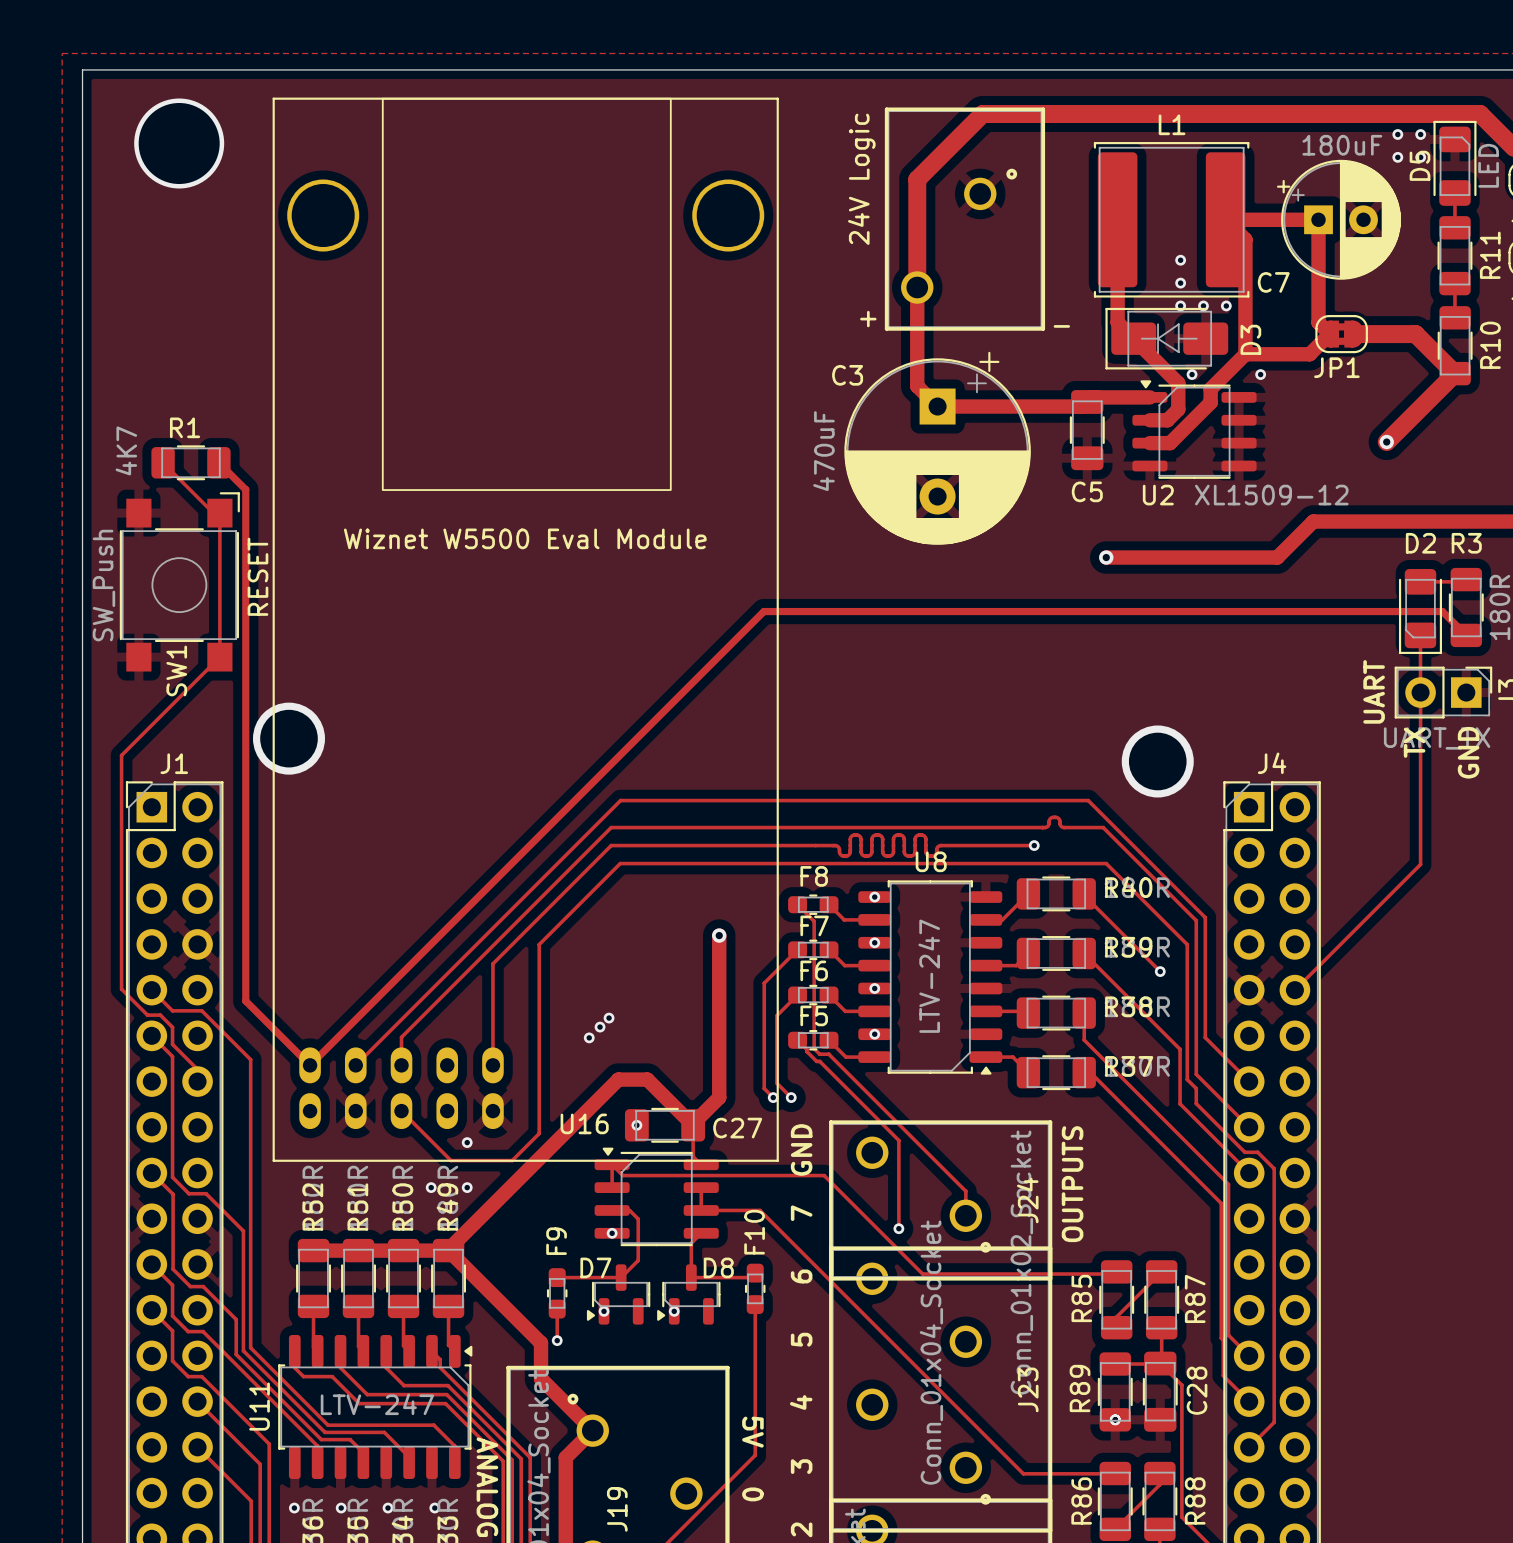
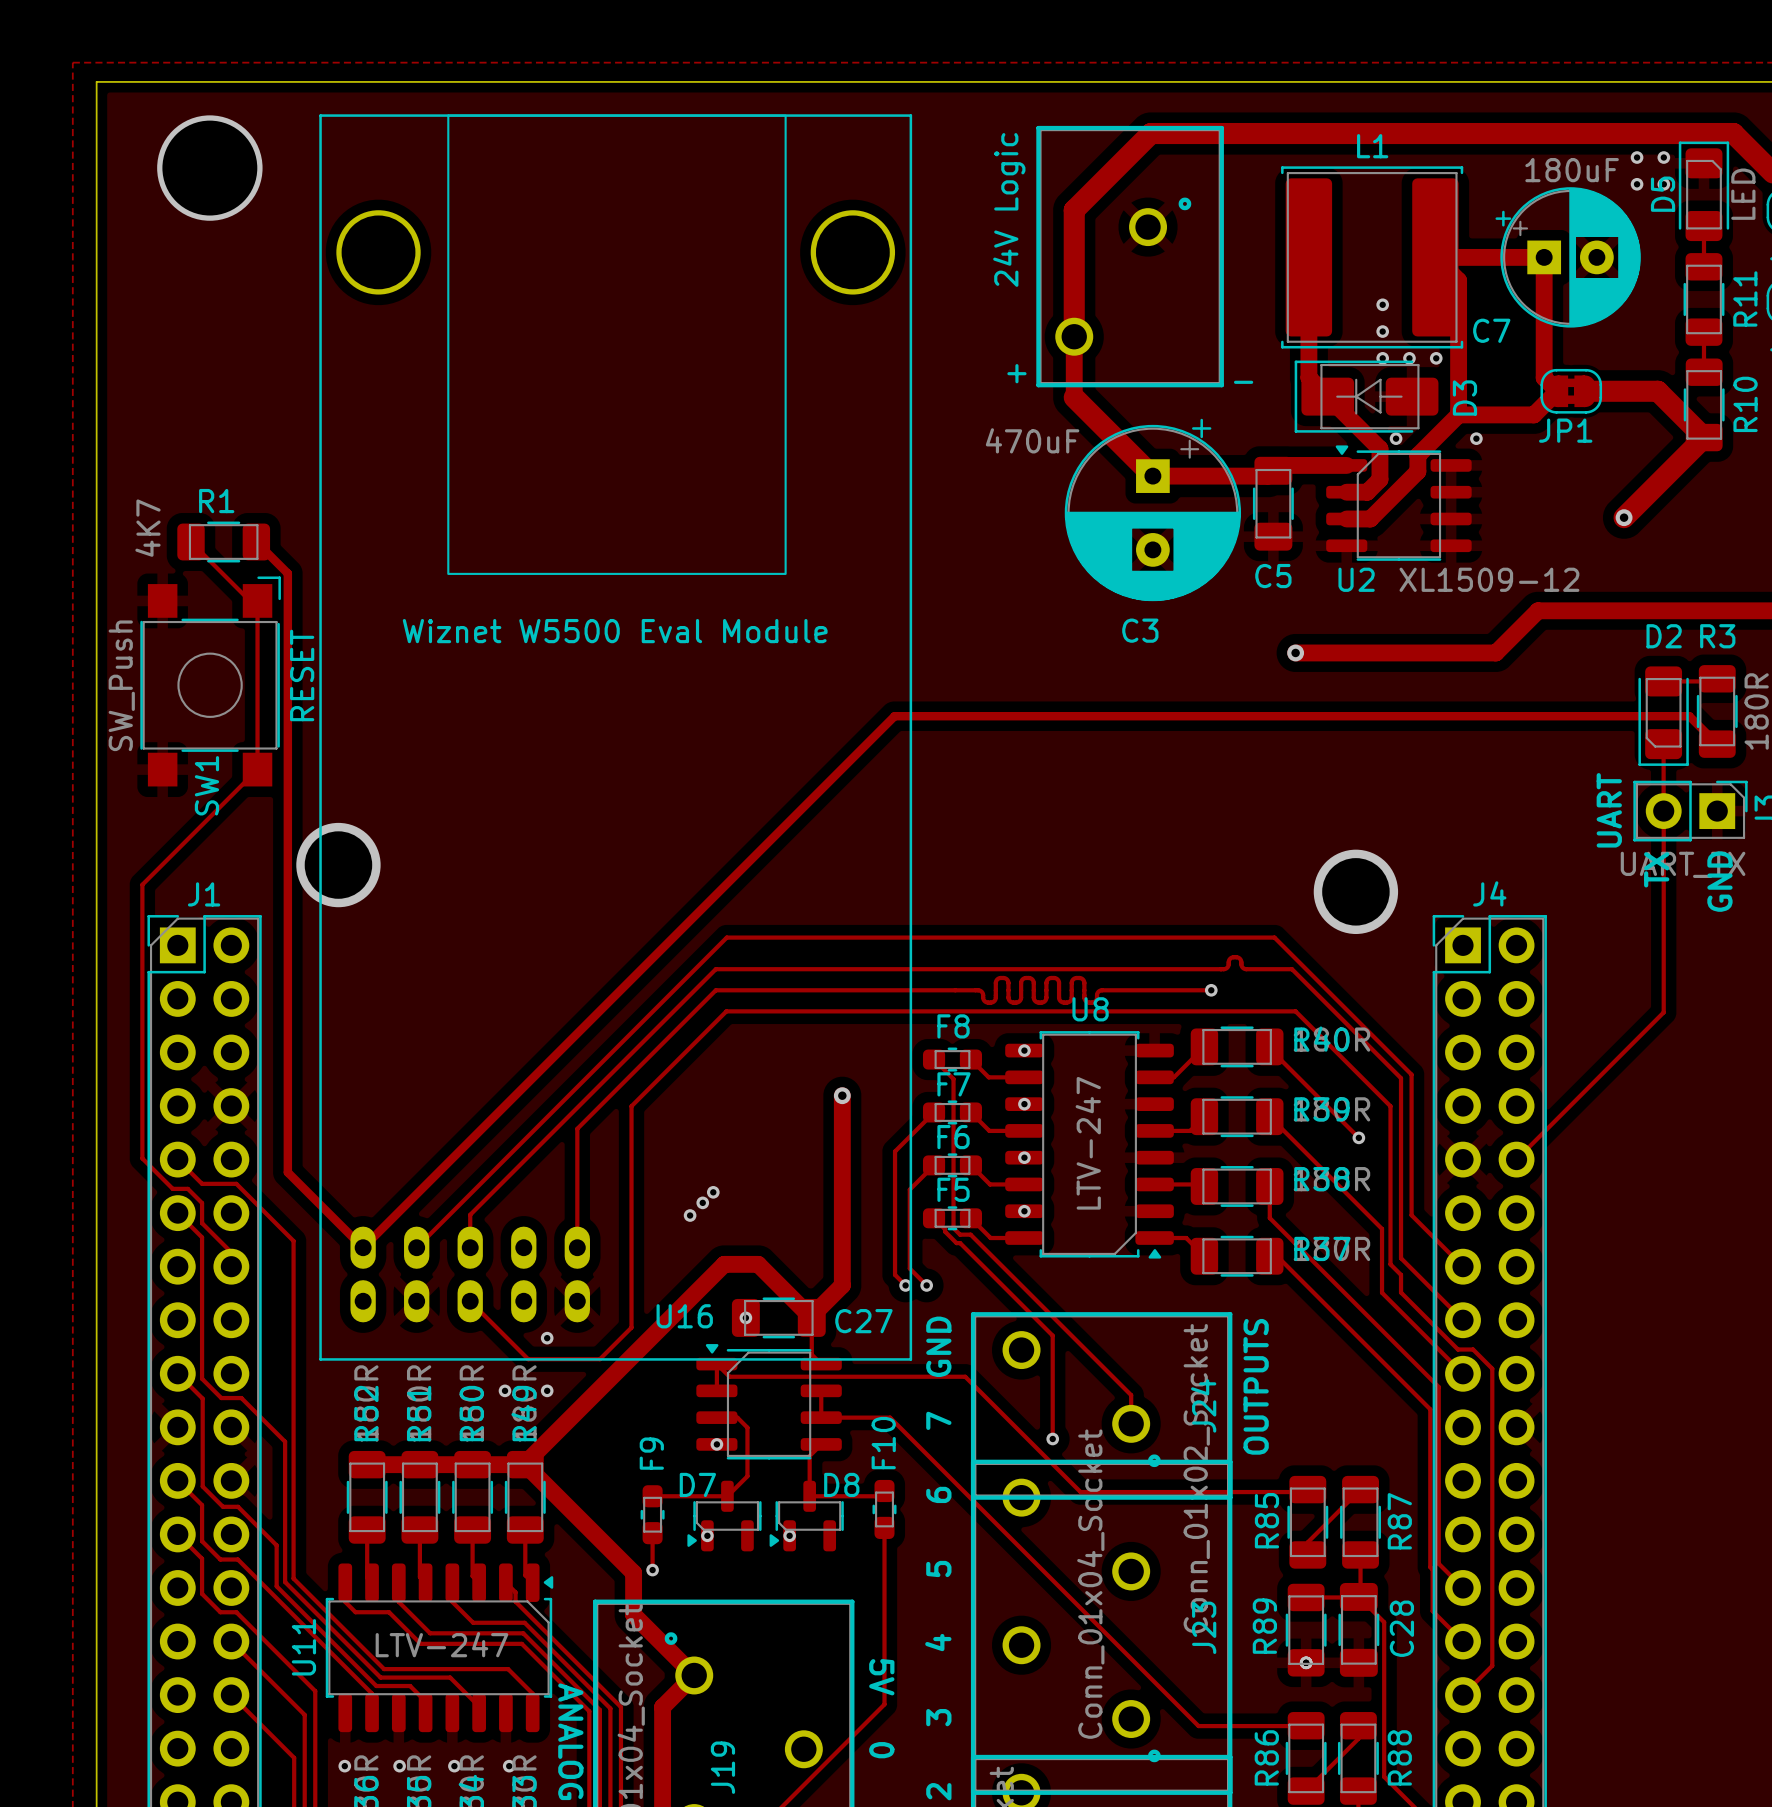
track: (917, 339) (917, 386) (937, 406) (984, 406) -> (1074, 397) (1152, 476)
C3 footprint: [844, 351, 1031, 545] -> [1064, 418, 1242, 602]
C3 name position: C3 (847, 375) -> C3 (1140, 630)
C3 value position: 470uF (823, 451) -> 470uF (1032, 440)

